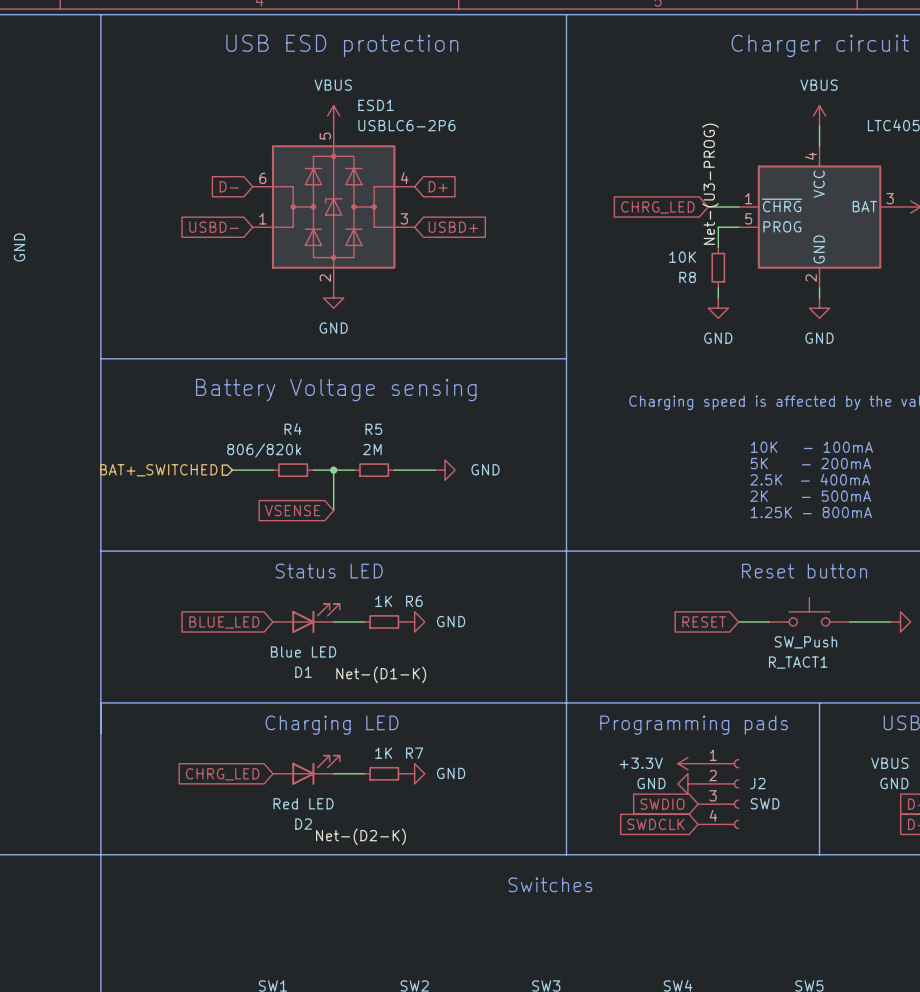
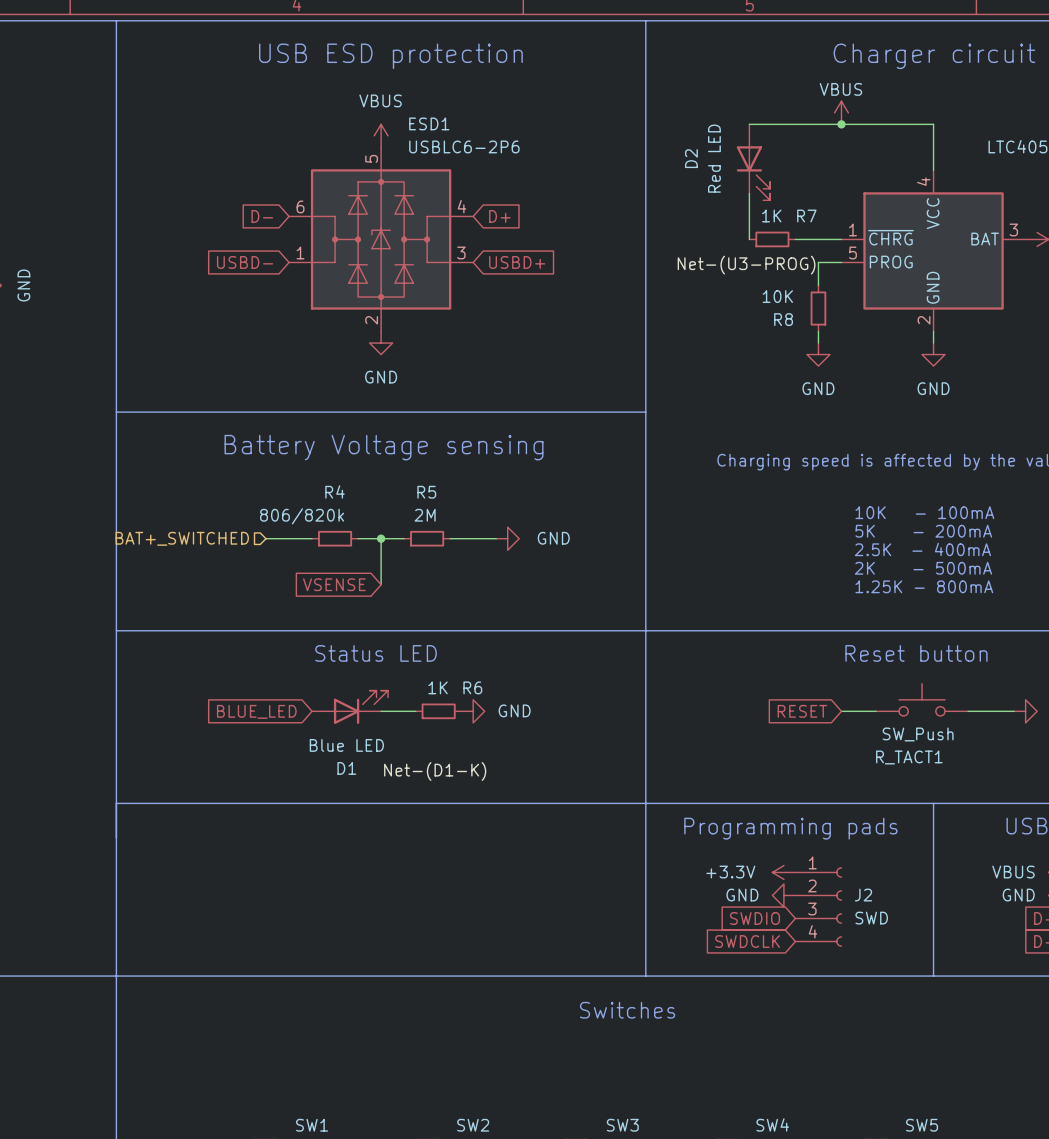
power symbol text position: VBUS (819, 85) -> VBUS (840, 89)
wire: none -> (749, 124) (933, 124) (933, 147)
junction: none -> (841, 124)
power symbol position: VBUS (819, 115) -> VBUS (841, 112)
wire: none -> (749, 193) (749, 239)
label rotation: 0° (710, 184) -> 90° clockwise (746, 265)
wire: none -> (795, 239) (806, 239)
global label: CHRG_LED (657, 207) -> none
text: Charging LED (332, 725) -> none
D2 position: (306, 770) -> (753, 162)
D2 rotation: 0° (315, 770) -> 90° clockwise (753, 173)
wire: (333, 773) (364, 773) -> none
R7 position: (384, 773) -> (772, 239)
power symbol: GND (414, 773) -> none
global label: CHRG_LED (222, 774) -> none
label: Net-(D2-K) (360, 836) -> none

